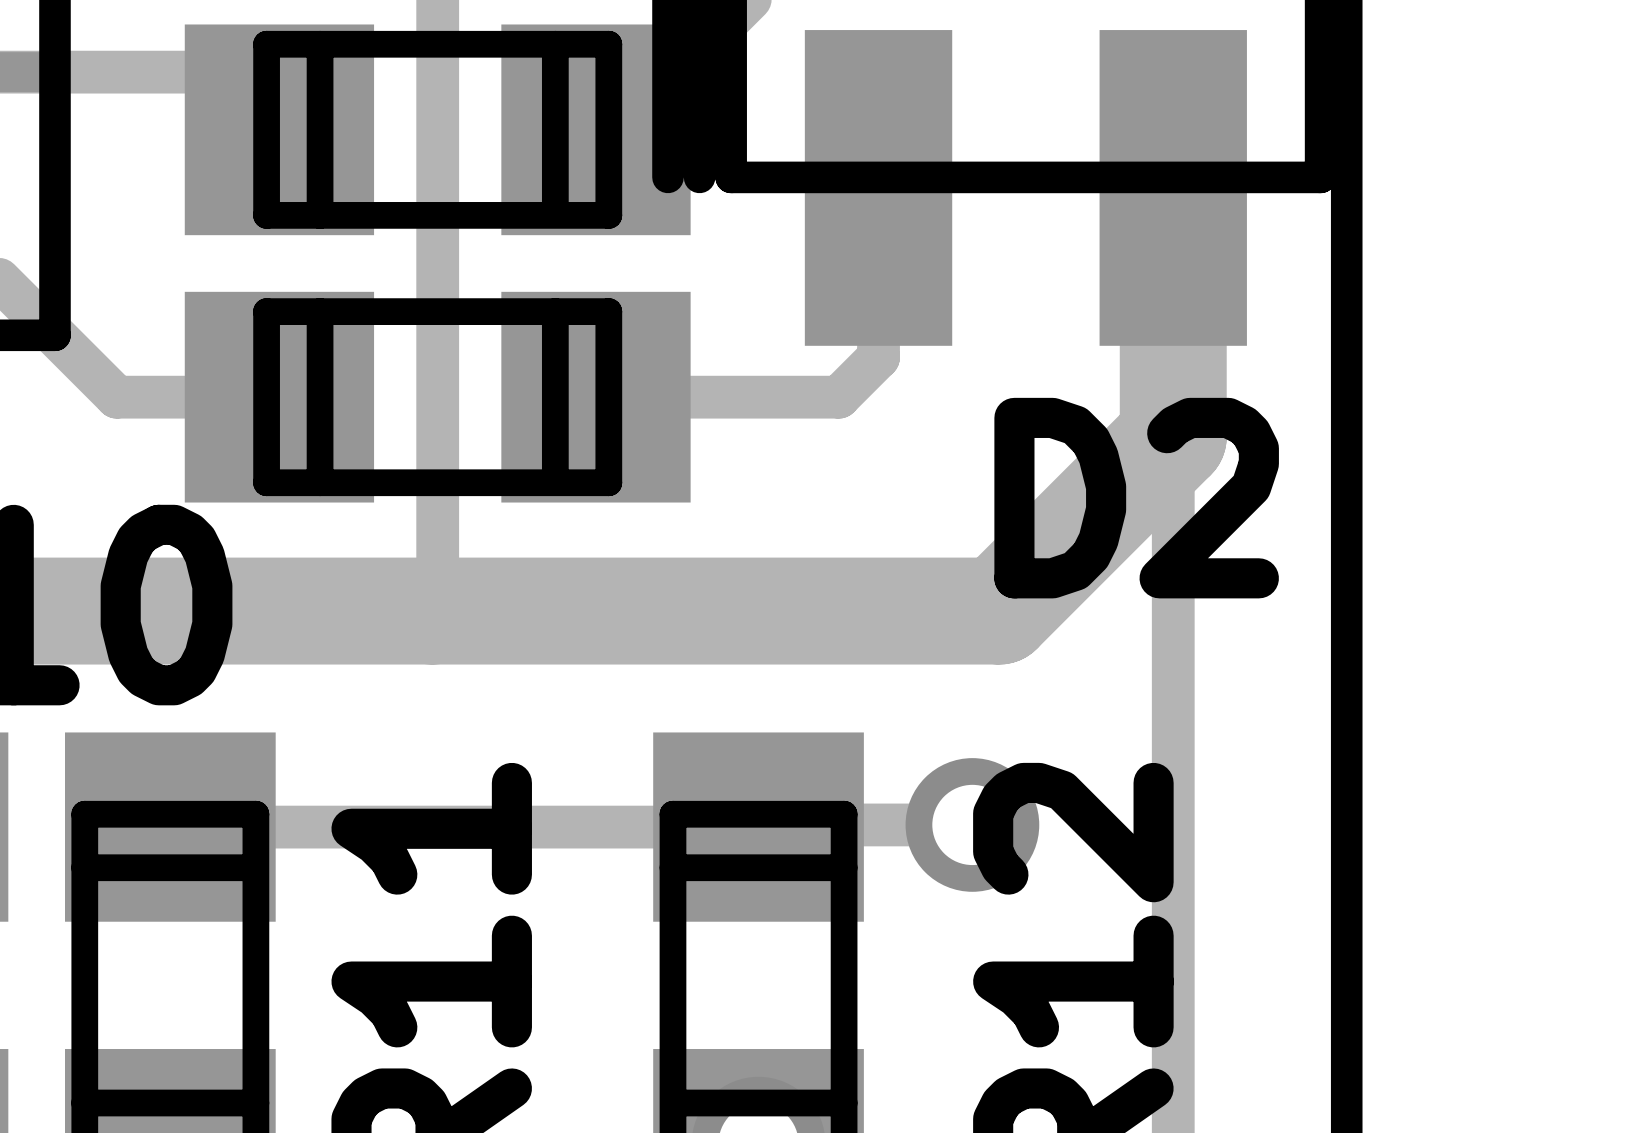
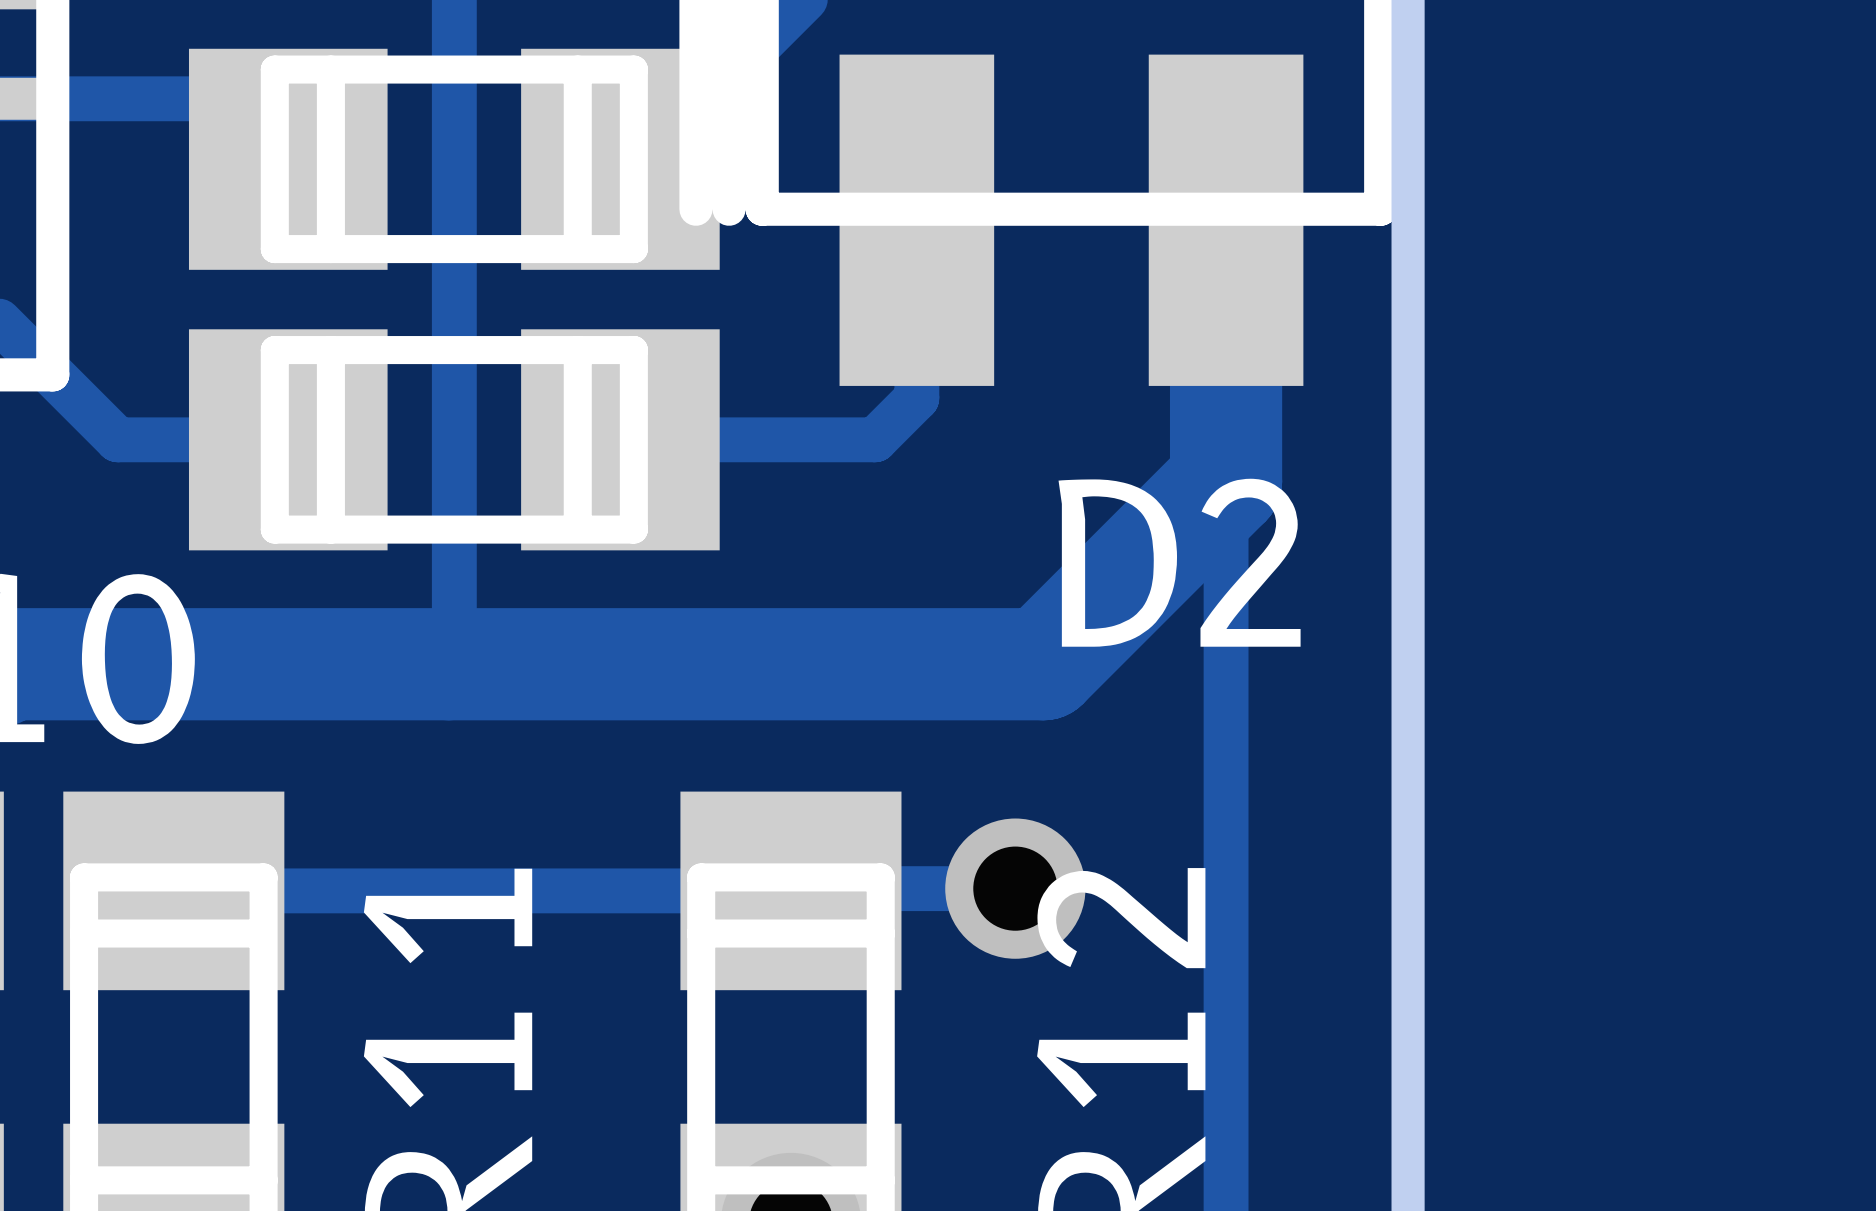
D2 name position: D2 (1136, 498) -> D2 (1179, 562)

